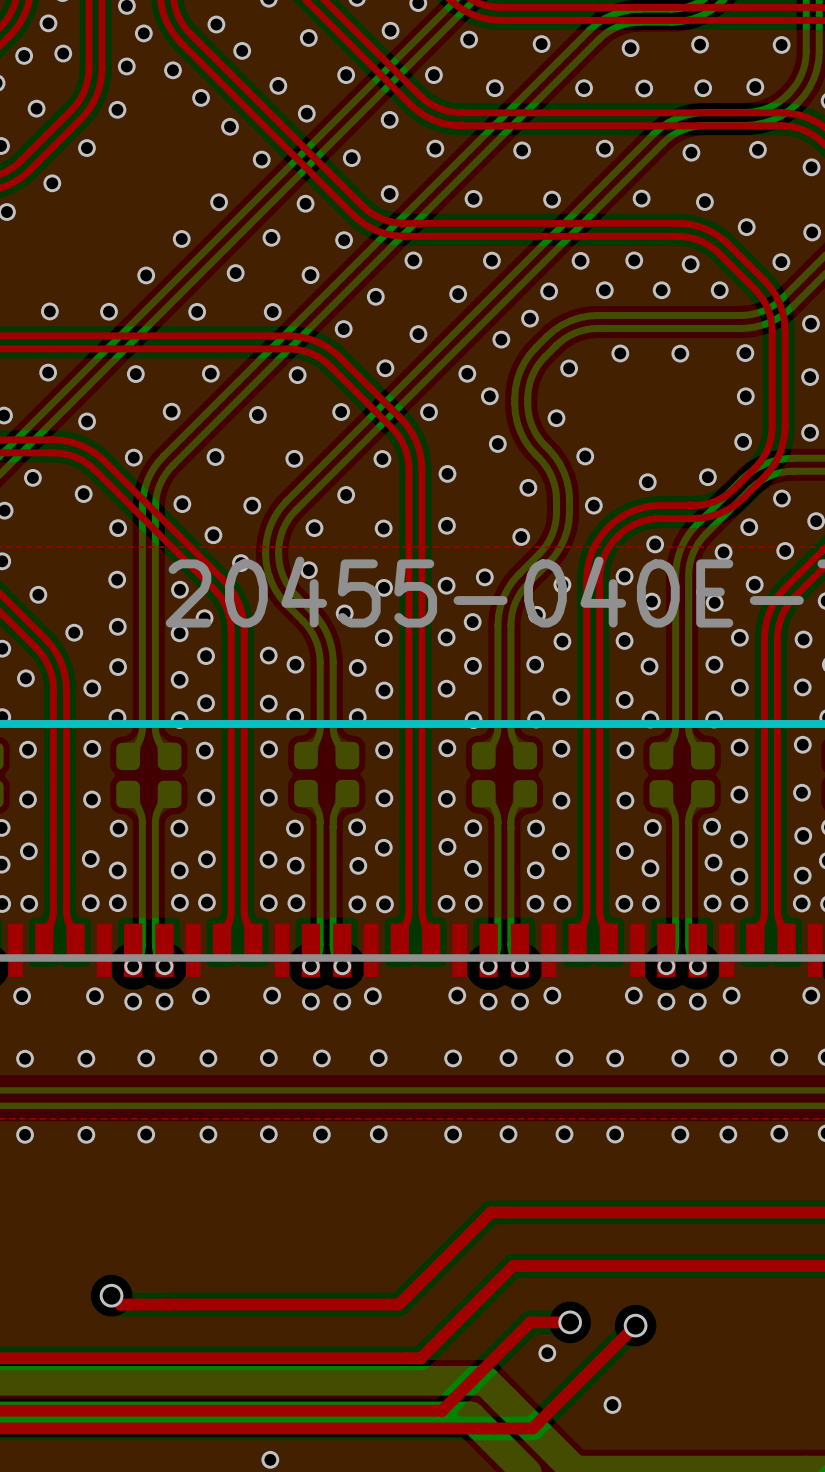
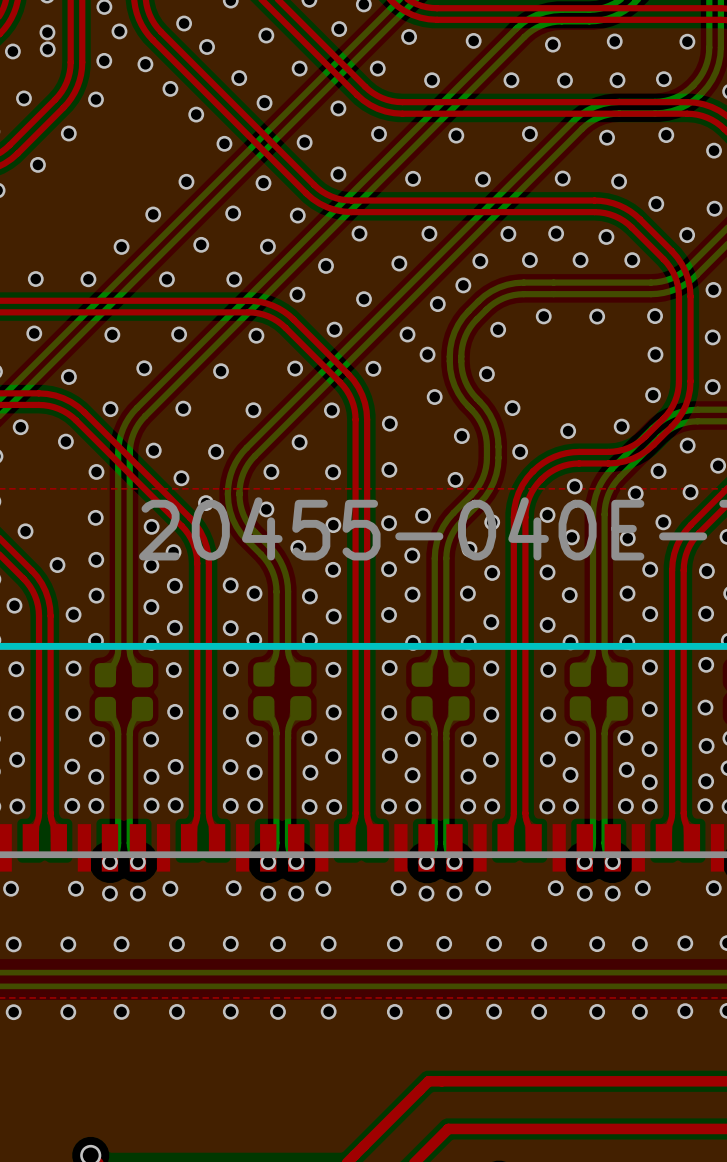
via position: (48, 23) -> (47, 32)

